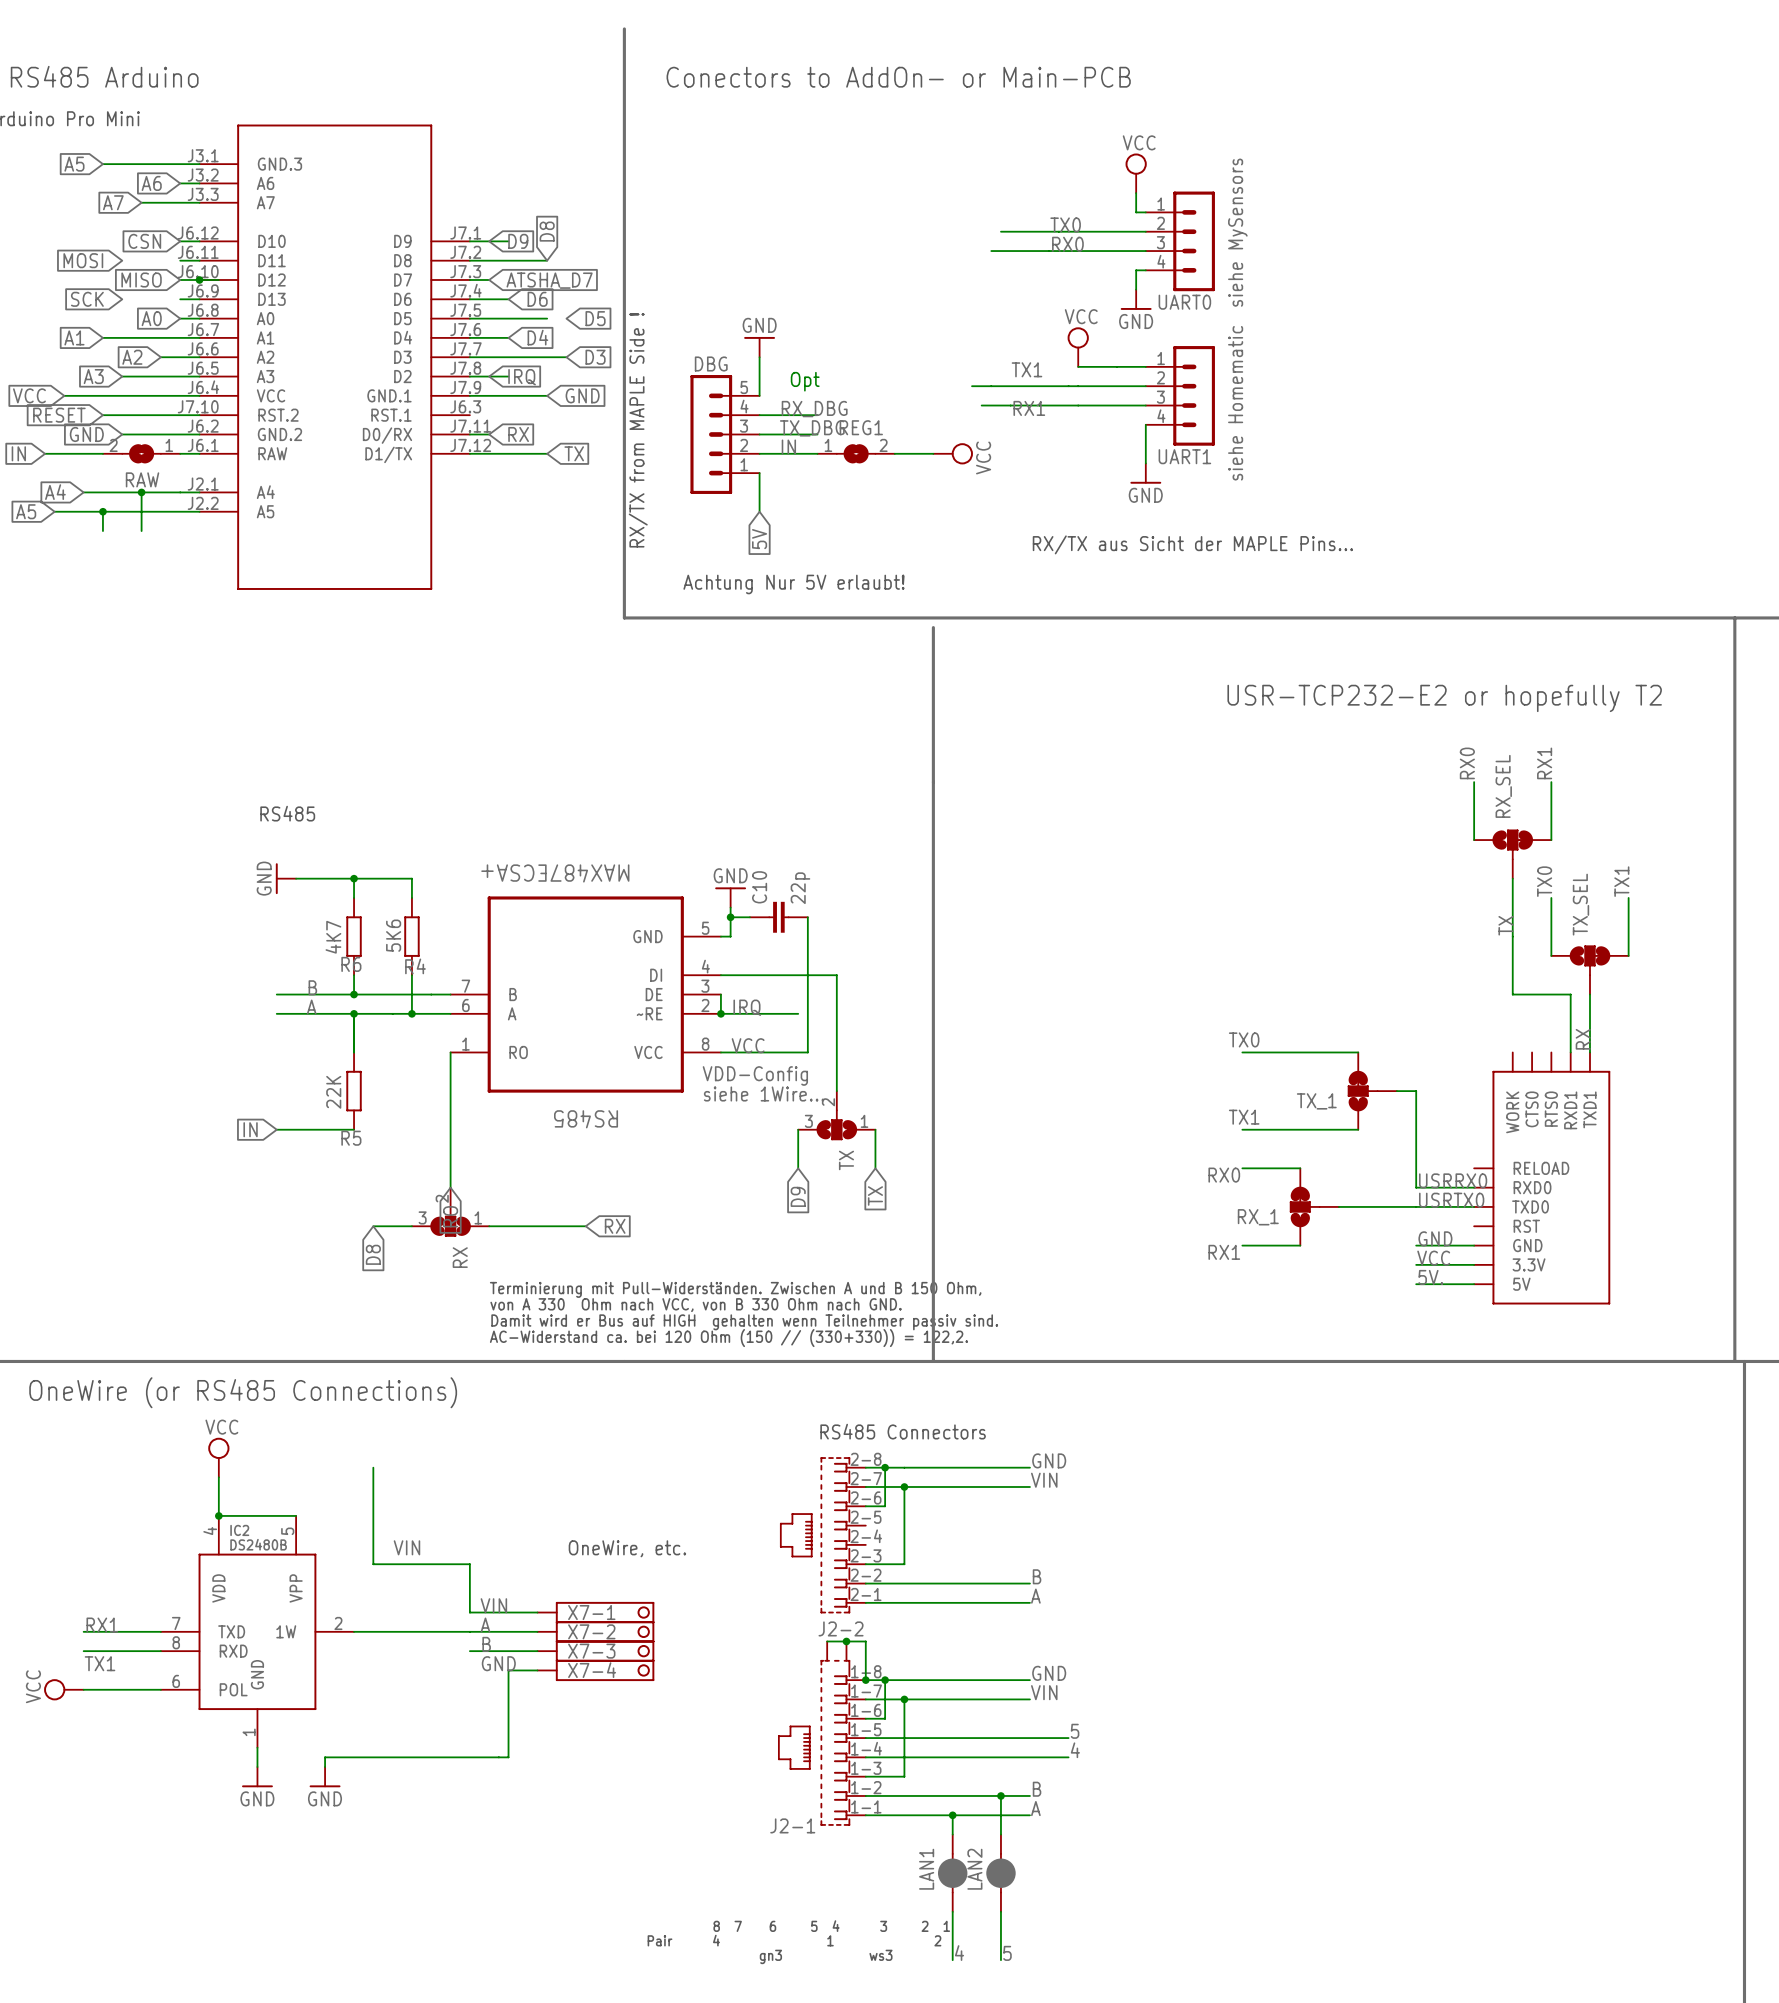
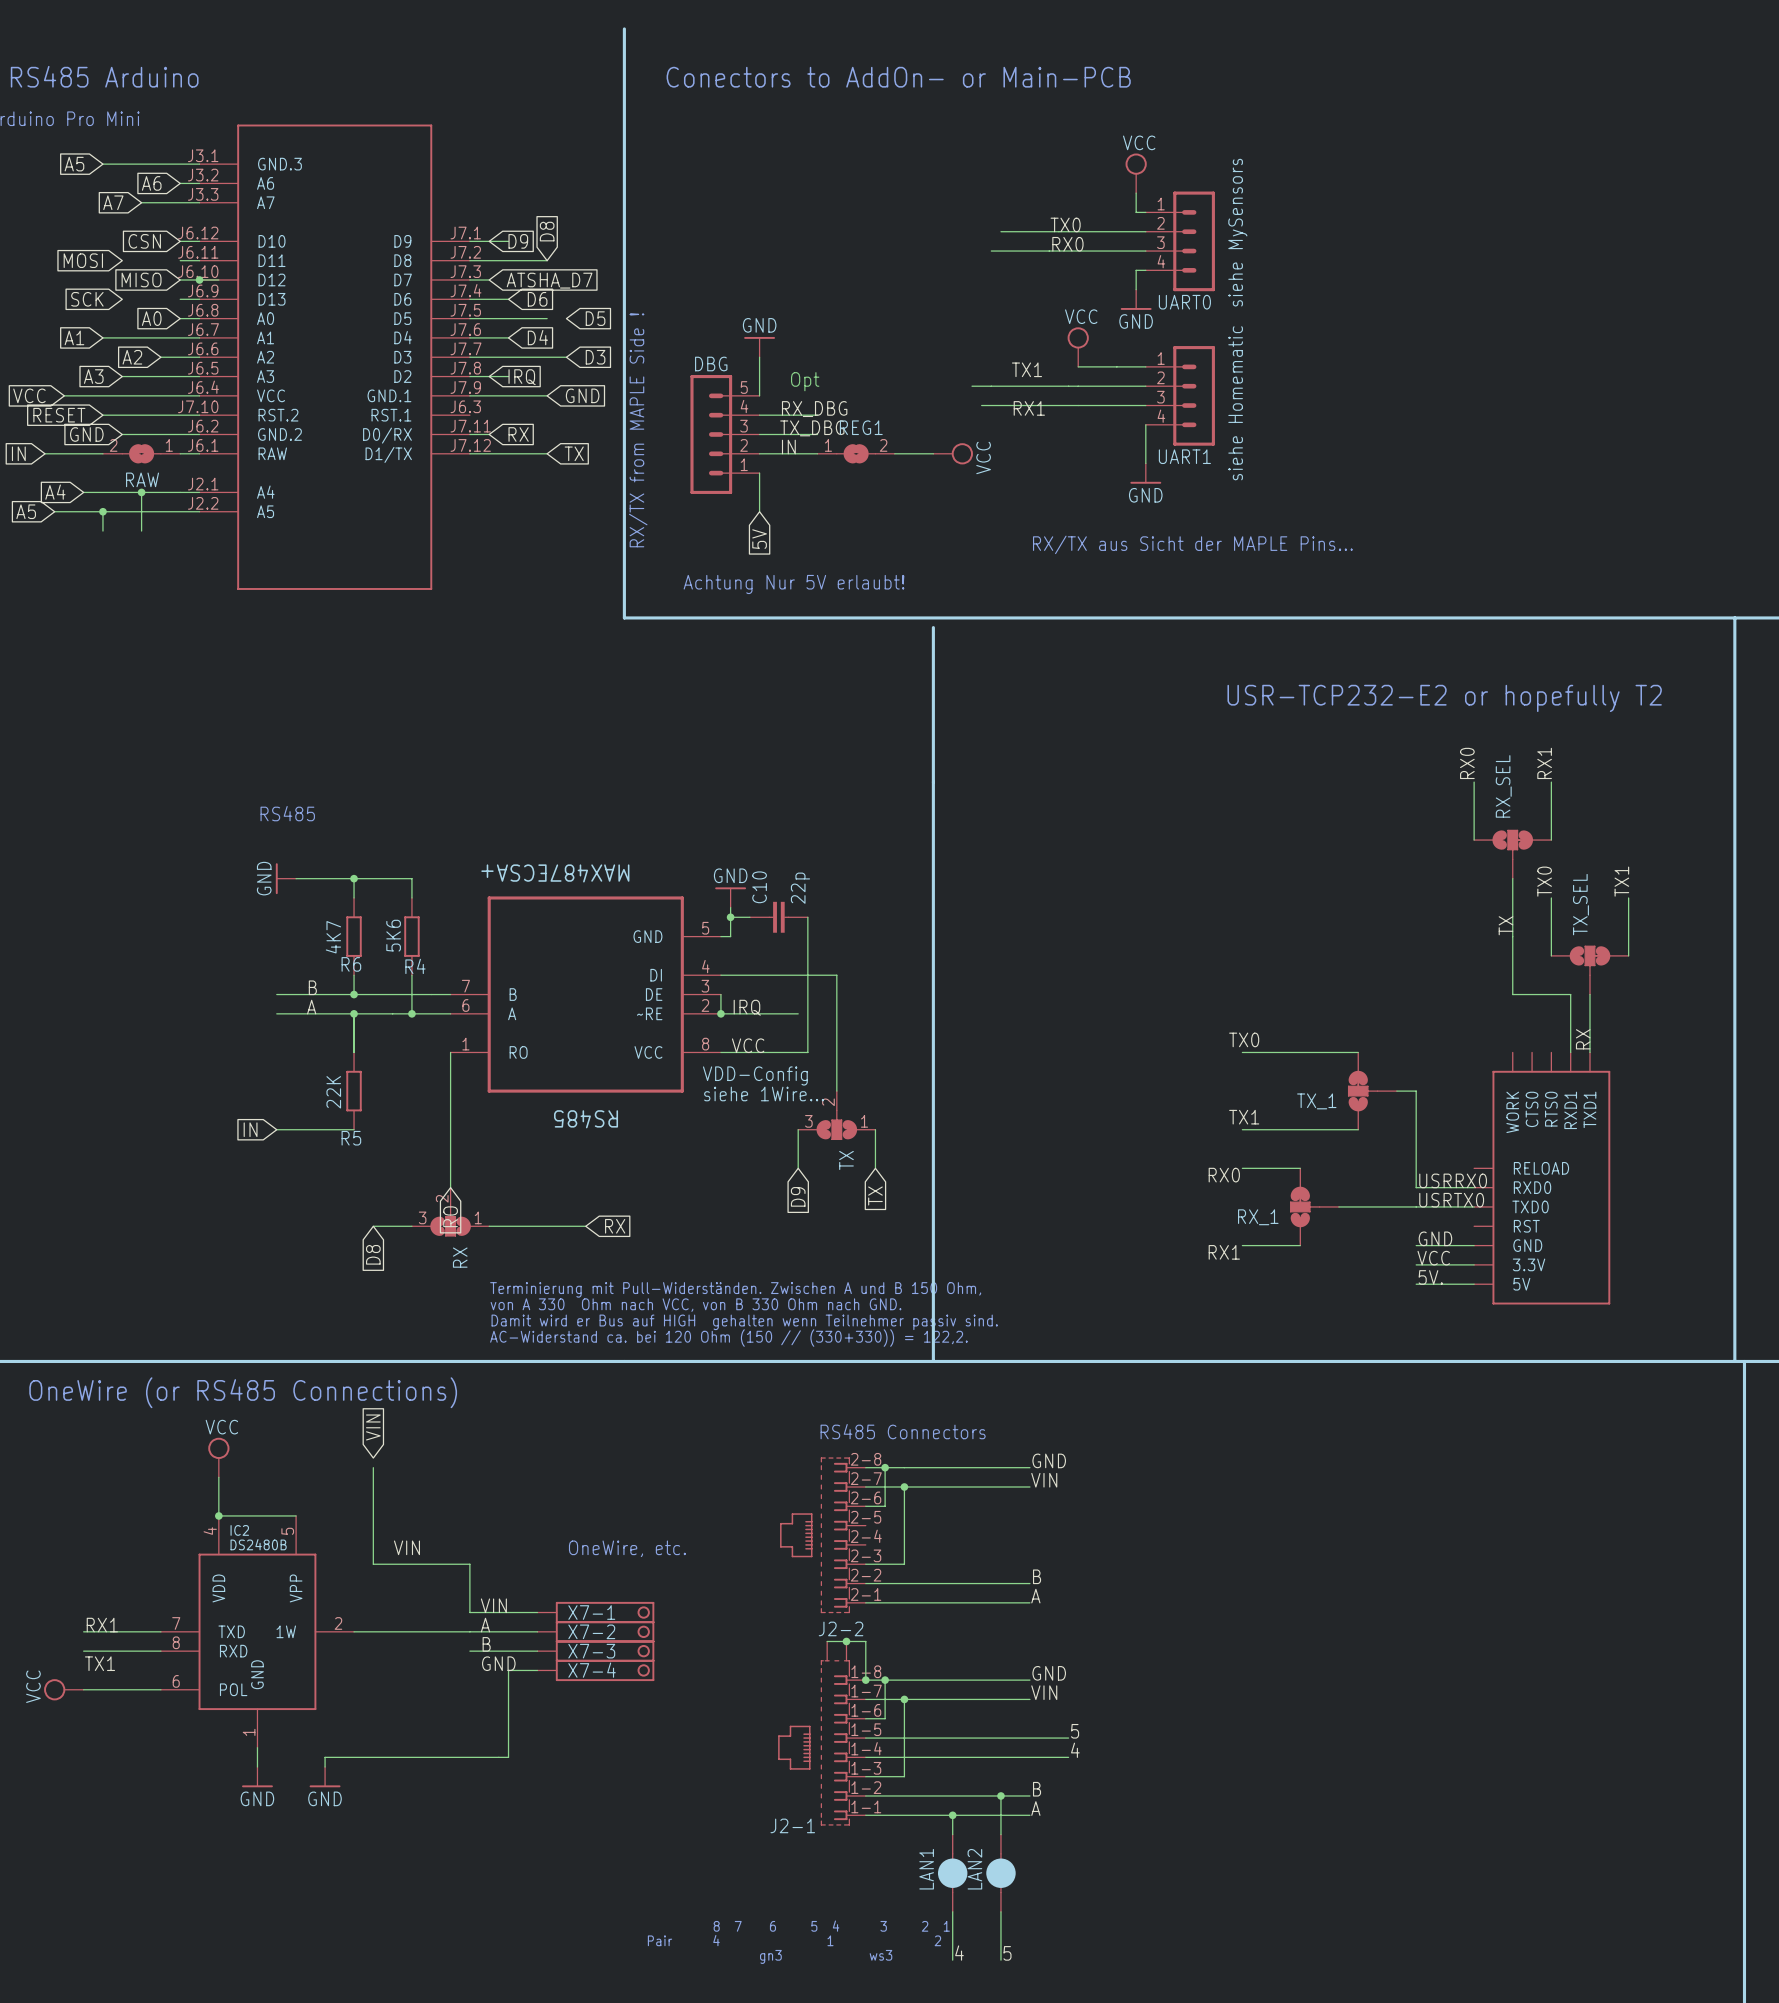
global label: none -> VIN (373, 1427)

